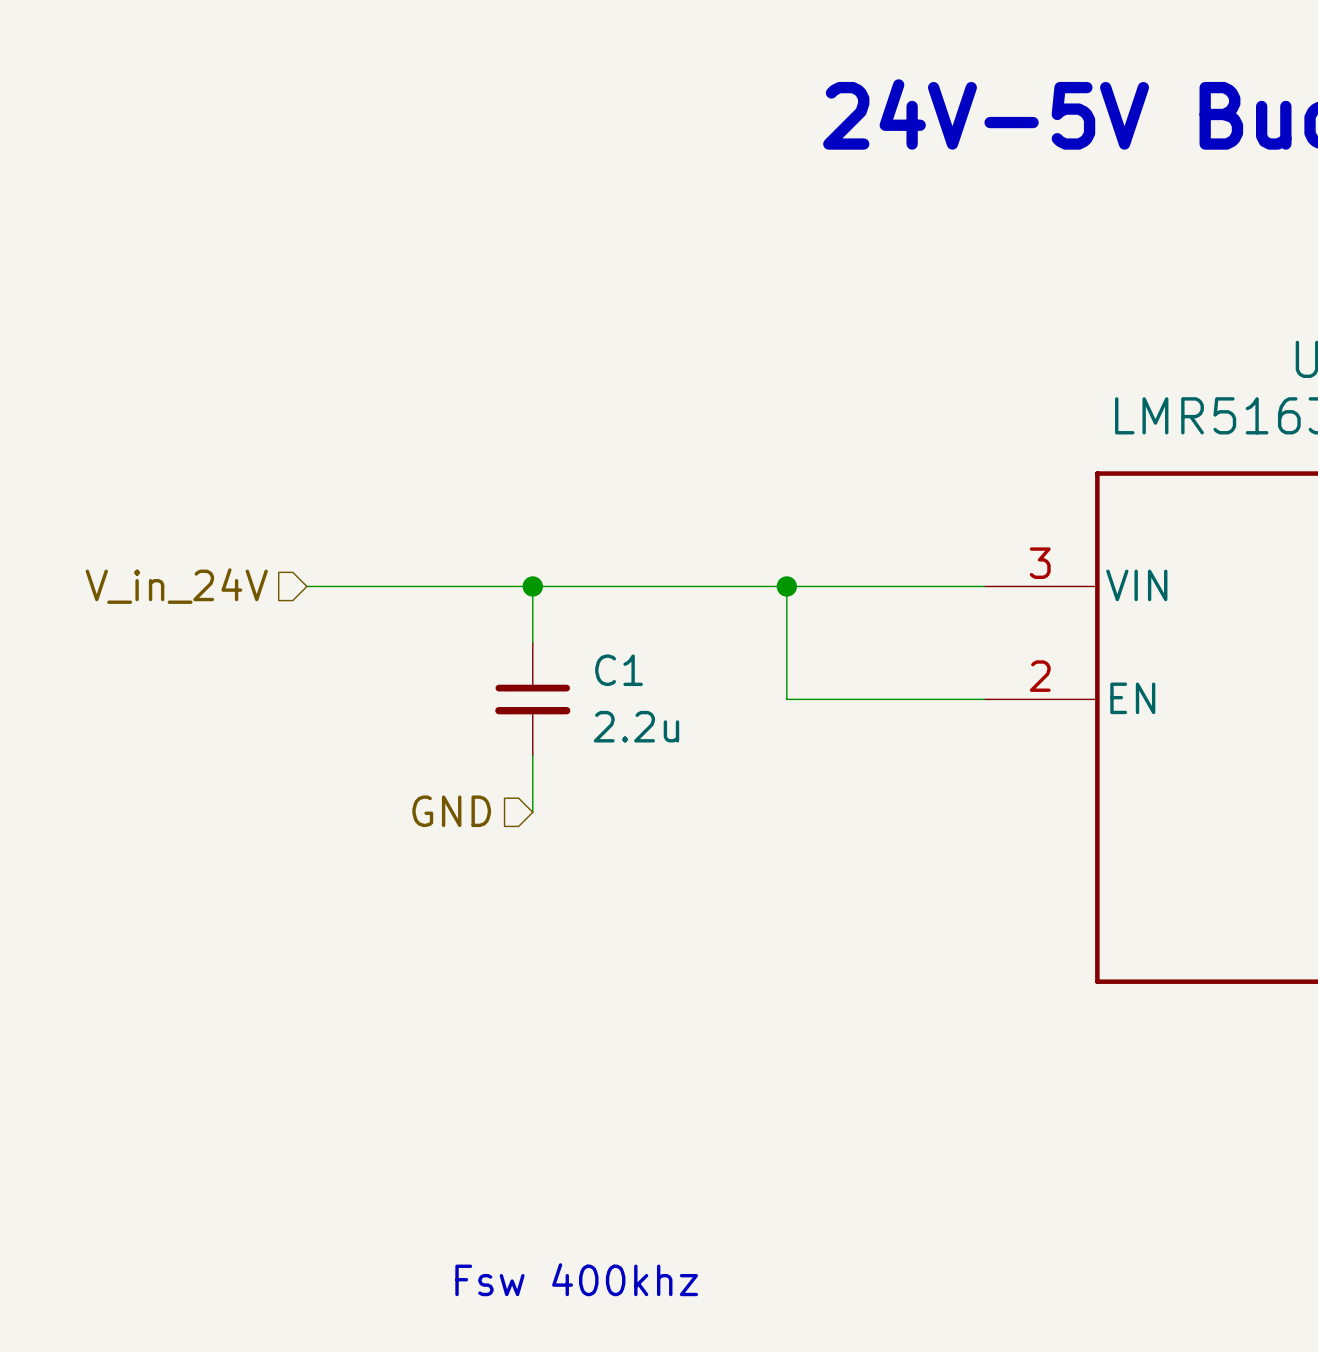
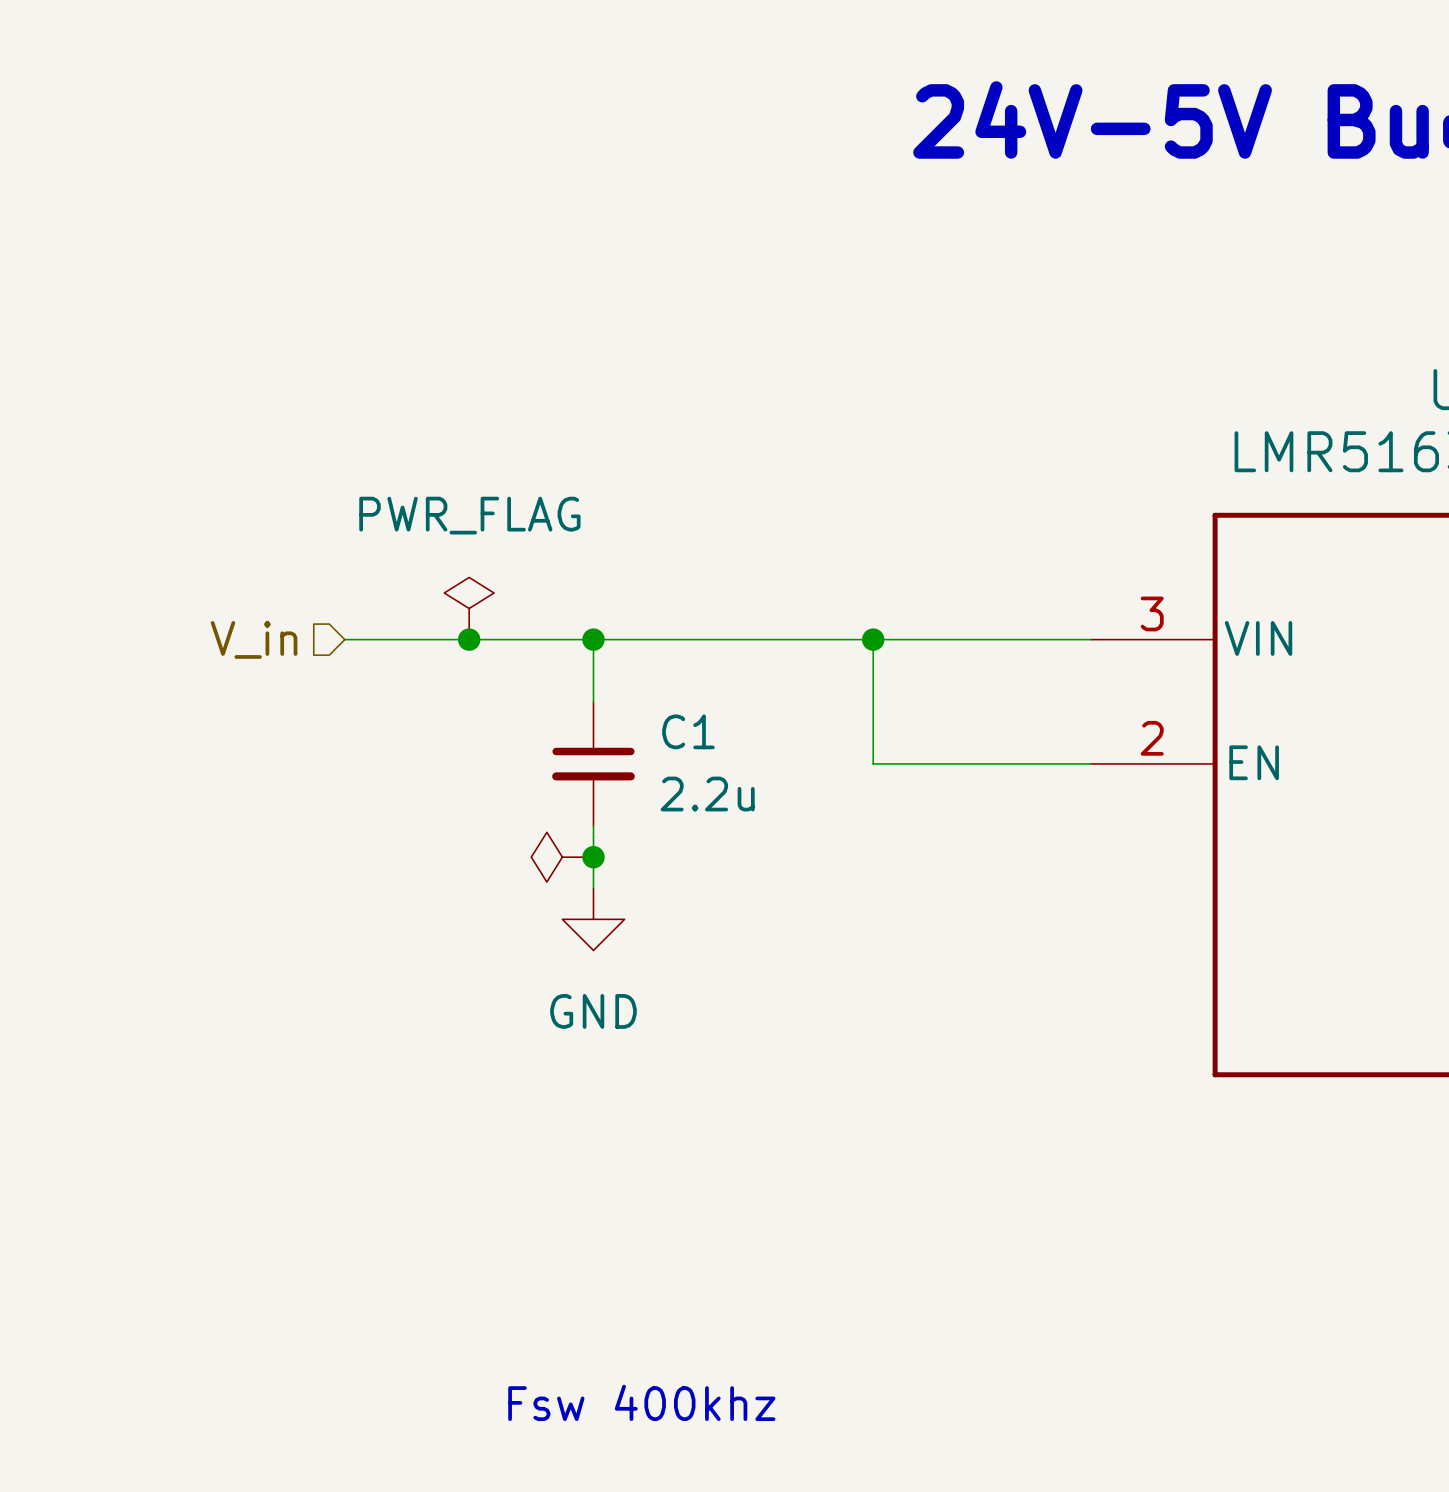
power symbol: none -> PWR_FLAG (469, 608)
hierarchical label: V_in_24V (176, 586) -> V_in (254, 639)
junction: none -> (469, 639)
power symbol: none -> (562, 857)
junction: none -> (593, 857)
hierarchical label: GND (451, 811) -> none
power symbol: none -> GND (593, 919)

